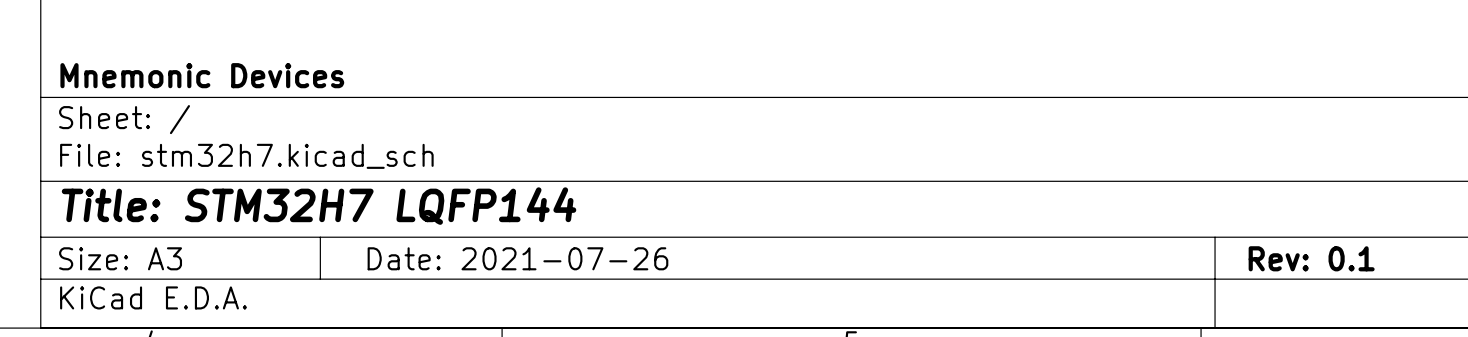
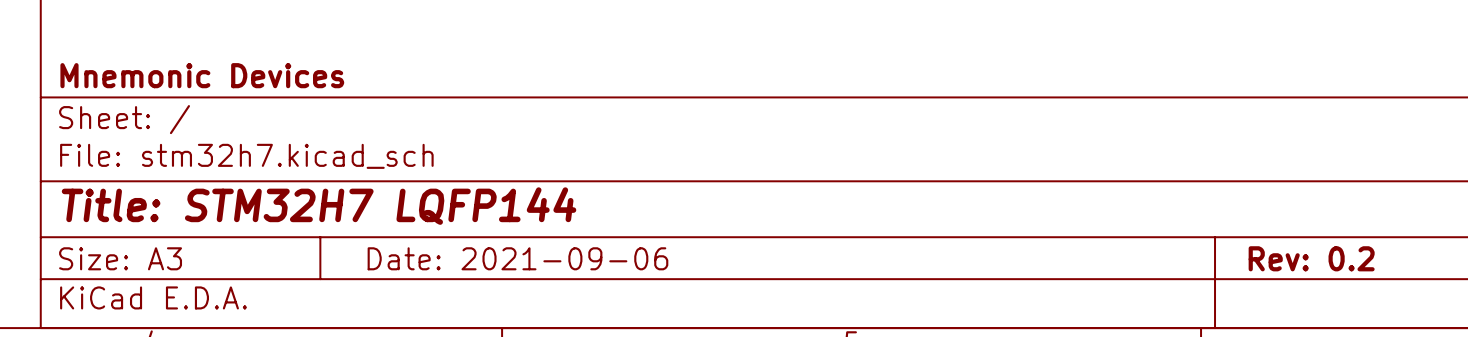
title block: Date: 2021-07-26 (517, 258) -> Date: 2021-09-06 (517, 258)
title block: Rev: 0.1 (1311, 258) -> Rev: 0.2 (1311, 258)

